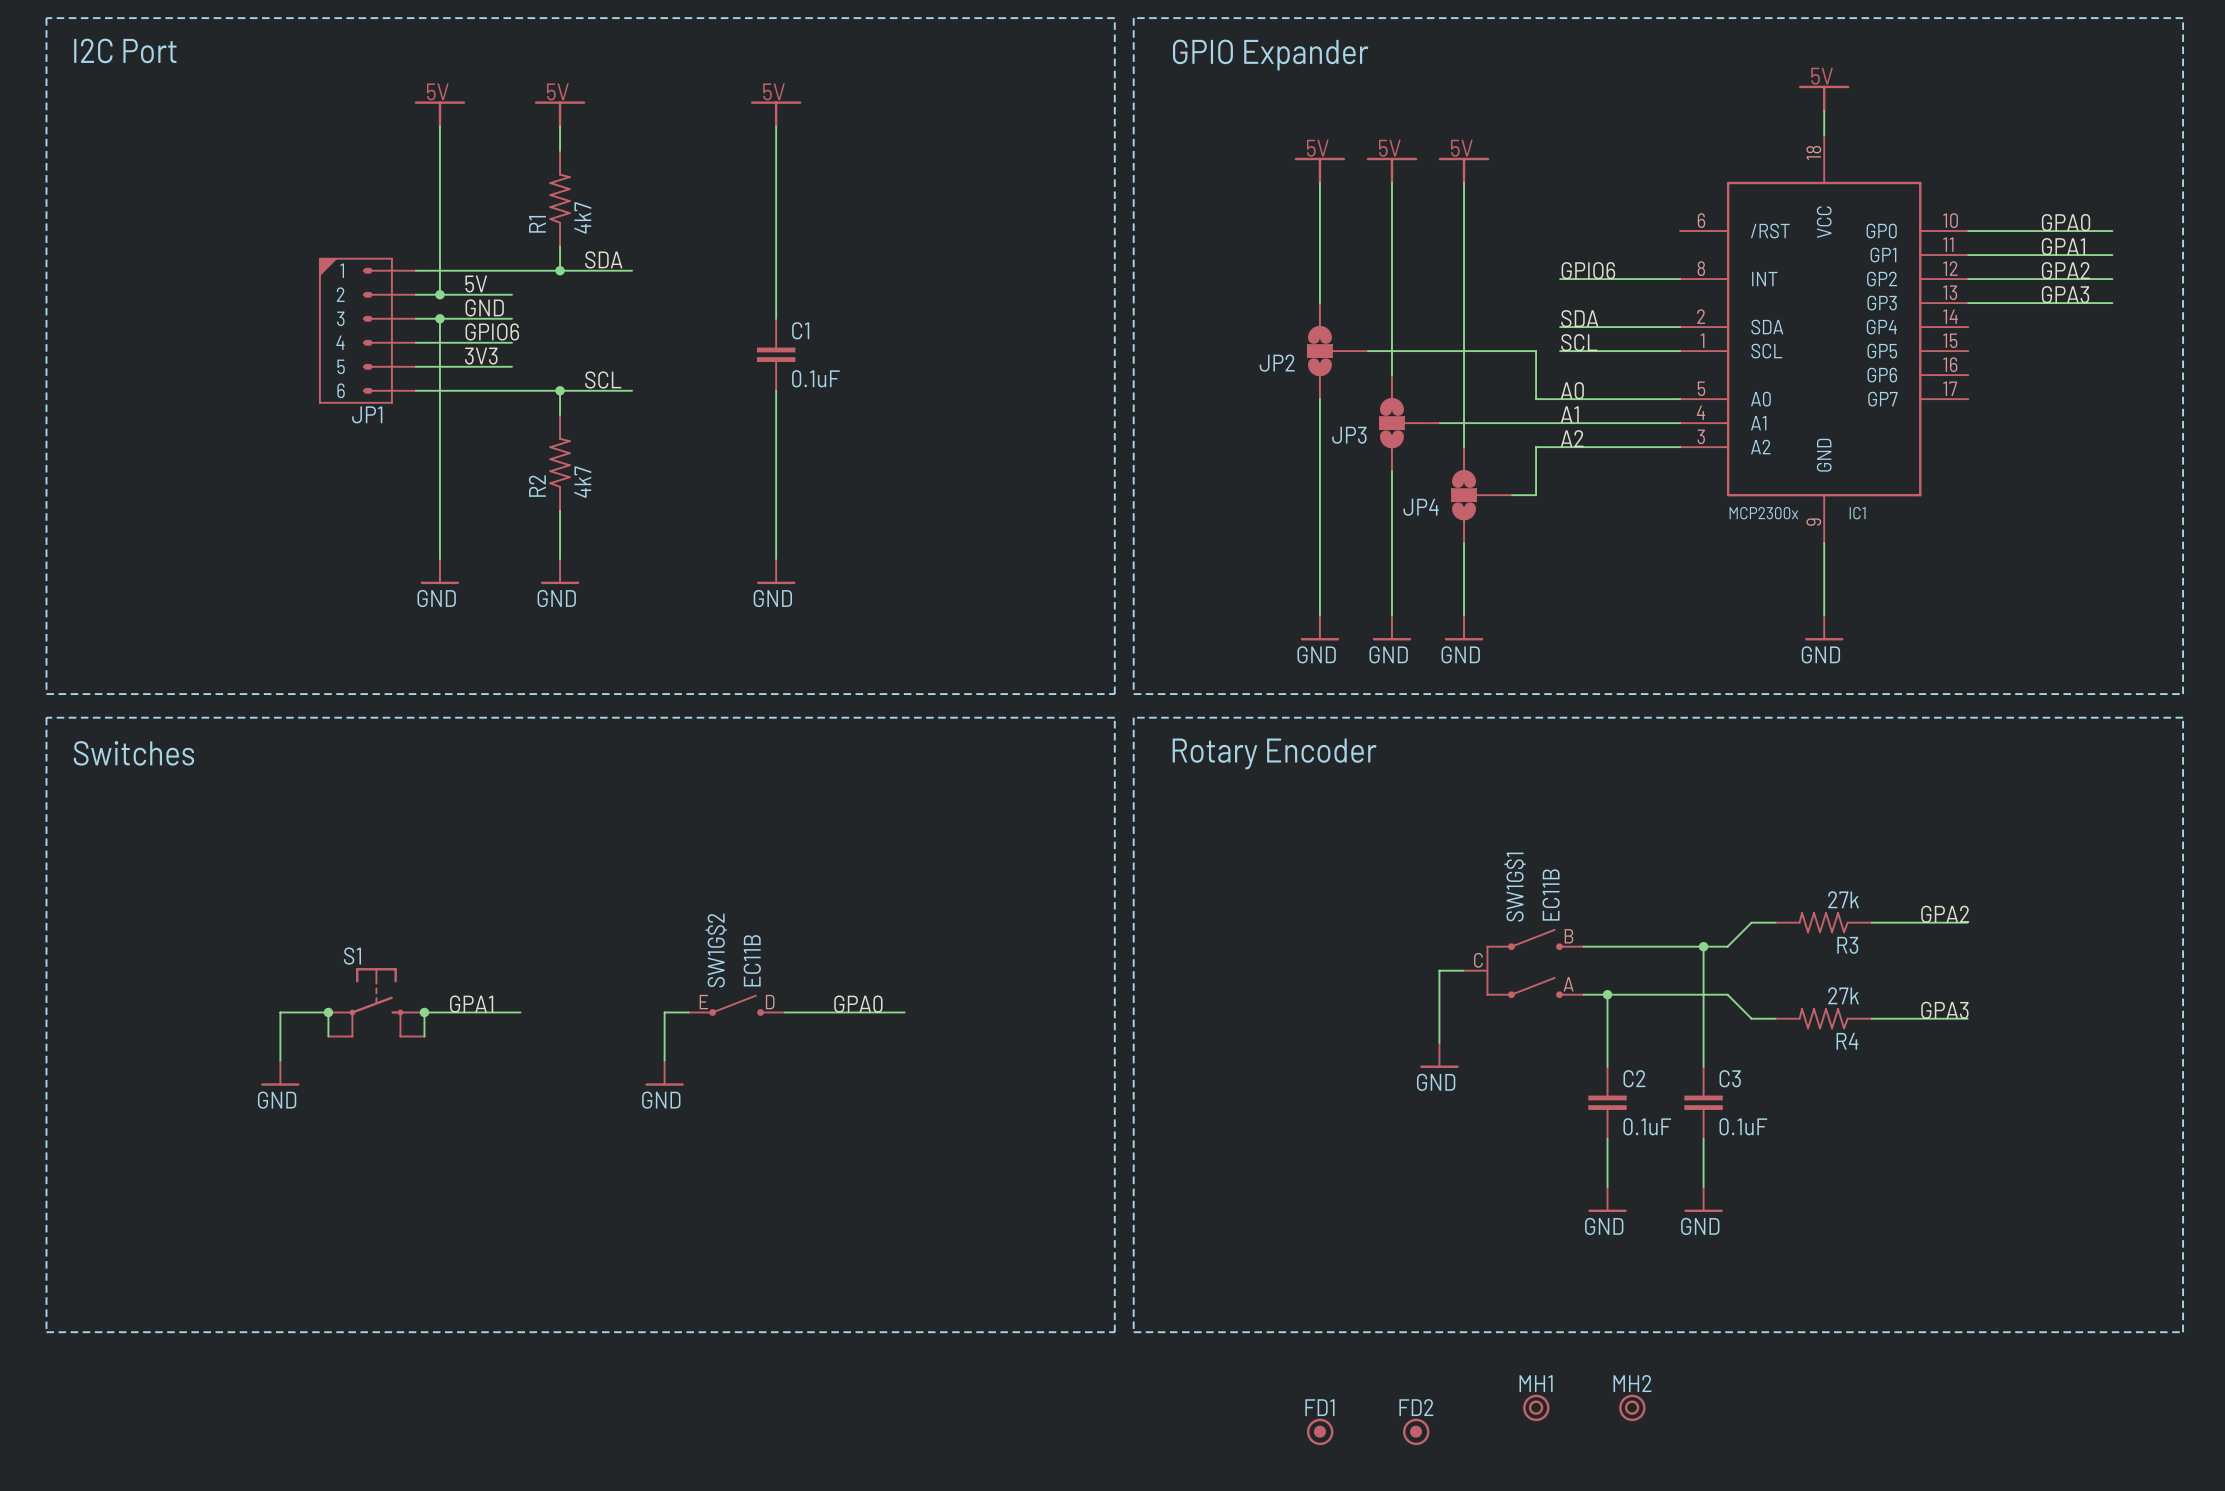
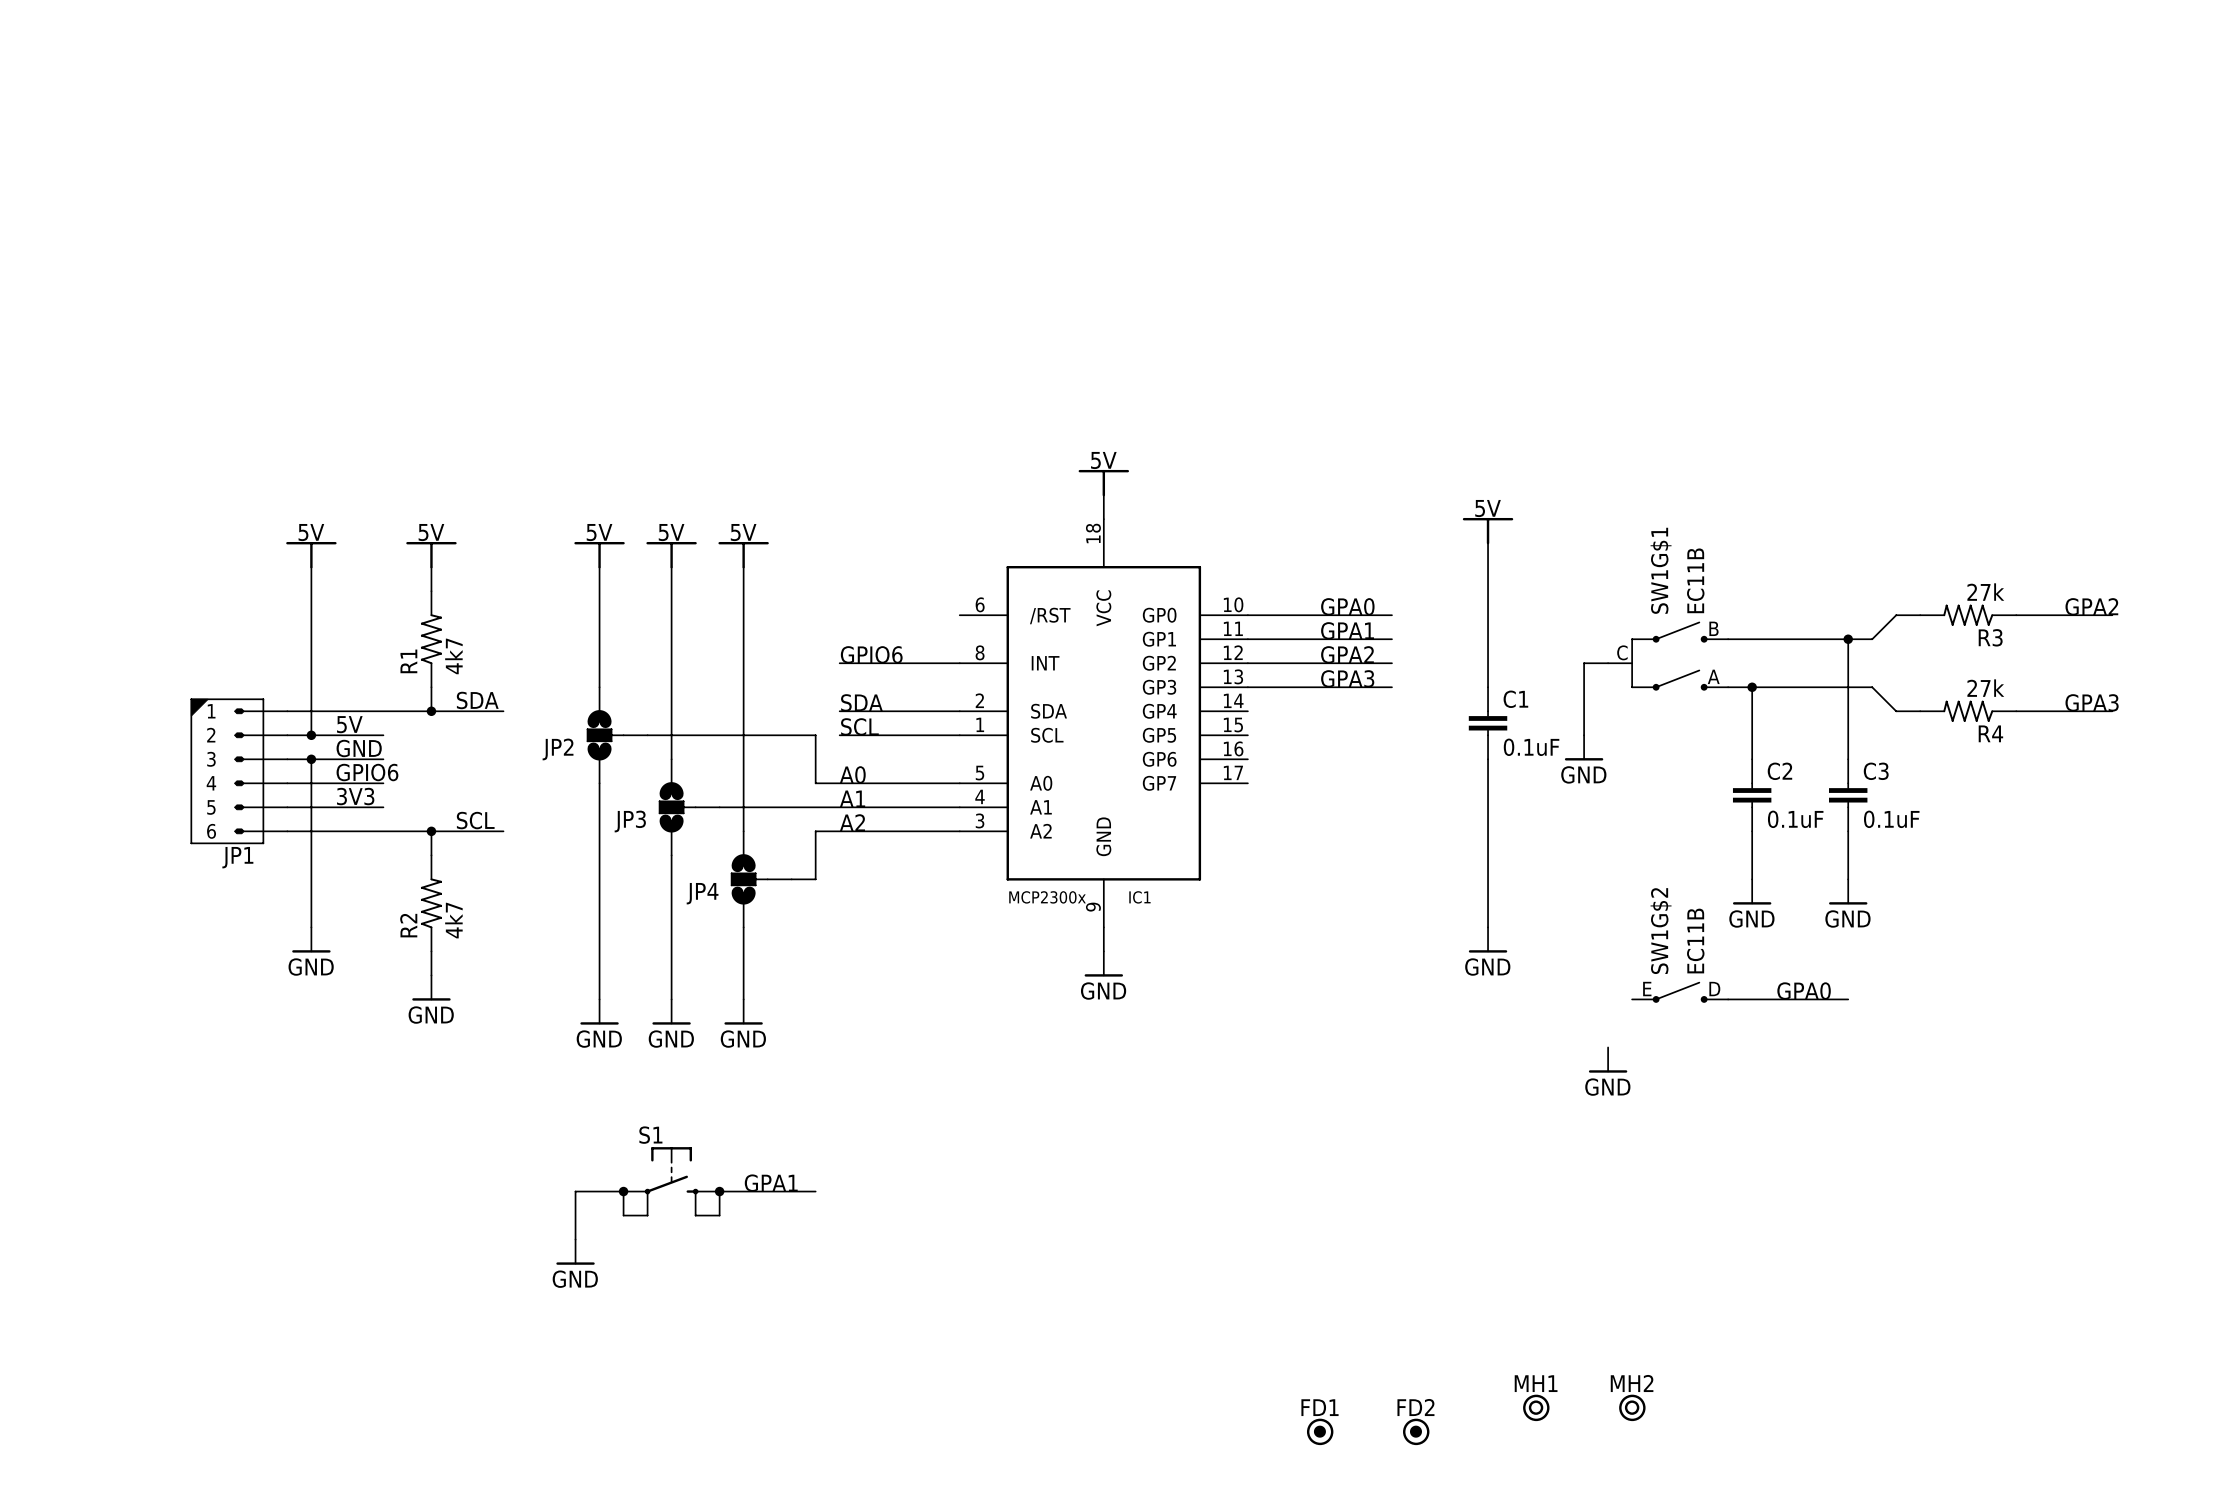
line: (46, 18) (1114, 18) (1114, 694) (46, 694) (46, 18) -> none
line: (1133, 18) (2183, 18) (2183, 694) (1133, 694) (1133, 18) -> none
text: I2C Port (125, 50) -> none
text: GPIO Expander (1270, 55) -> none
power symbol: (1824, 98) -> none
wire: (1824, 110) (1824, 134) -> none
power symbol: (439, 114) -> none
power symbol: (560, 114) -> none
power symbol: (776, 114) -> none
wire: (439, 126) (439, 294) -> none
wire: (560, 126) (560, 150) -> none
wire: (776, 126) (776, 318) -> none
power symbol: (1319, 170) -> none
power symbol: (1391, 170) -> none
power symbol: (1464, 170) -> none
wire: (1319, 182) (1319, 303) -> none
wire: (1391, 182) (1391, 375) -> none
wire: (1464, 182) (1464, 447) -> none
R1 position: (560, 198) -> (431, 639)
label: GPA0 (2066, 222) -> none
wire: (1968, 231) (2112, 231) -> none
wire: (560, 246) (560, 270) -> none
label: GPA1 (2063, 246) -> none
wire: (1968, 255) (2112, 255) -> none
label: SDA (603, 259) -> none
wire: (415, 270) (632, 270) -> none
junction: (560, 270) -> none
label: GPIO6 (1588, 270) -> none
label: GPA2 (2065, 270) -> none
wire: (1560, 279) (1680, 279) -> none
wire: (1968, 279) (2112, 279) -> none
label: 5V (476, 284) -> none
wire: (415, 294) (512, 294) -> none
junction: (439, 294) -> none
label: GPA3 (2065, 294) -> none
wire: (1968, 303) (2112, 303) -> none
label: GND (484, 307) -> none
wire: (415, 318) (512, 318) -> none
wire: (439, 318) (439, 558) -> none
junction: (439, 318) -> none
label: SDA (1579, 318) -> none
wire: (1560, 327) (1680, 327) -> none
JP1 position: (367, 330) -> (239, 771)
label: GPIO6 (492, 331) -> none
IC1 position: (1824, 339) -> (1103, 723)
wire: (415, 342) (512, 342) -> none
label: SCL (1579, 342) -> none
JP2 position: (1337, 351) -> (617, 735)
wire: (1367, 351) (1536, 351) (1536, 399) (1680, 399) -> none
wire: (1560, 351) (1680, 351) -> none
C1 position: (776, 354) -> (1488, 723)
label: 3V3 (481, 356) -> none
wire: (415, 366) (512, 366) -> none
label: SCL (603, 380) -> none
wire: (415, 390) (632, 390) -> none
wire: (560, 390) (560, 414) -> (431, 567) (431, 591)
junction: (560, 390) -> none
wire: (776, 390) (776, 558) -> none
label: A0 (1572, 390) -> none
wire: (1319, 399) (1319, 615) -> none
label: A1 (1569, 414) -> none
JP3 position: (1409, 423) -> (689, 807)
wire: (1440, 423) (1680, 423) -> none
label: A2 (1572, 438) -> none
wire: (1680, 447) (1536, 447) (1536, 495) (1512, 495) -> none
R2 position: (560, 462) -> (431, 903)
wire: (1391, 471) (1391, 615) -> (1247, 615) (1391, 615)
power symbol: none -> (1103, 483)
wire: none -> (1103, 495) (1103, 519)
JP4 position: (1481, 495) -> (761, 879)
wire: (560, 510) (560, 558) -> none
power symbol: none -> (1488, 531)
wire: (1464, 543) (1464, 615) -> none
wire: none -> (1488, 543) (1488, 687)
wire: (1824, 543) (1824, 615) -> (1752, 687) (1752, 759)
power symbol: none -> (311, 555)
power symbol: none -> (431, 555)
power symbol: none -> (599, 555)
power symbol: none -> (671, 555)
power symbol: none -> (743, 555)
wire: none -> (311, 567) (311, 735)
wire: none -> (599, 567) (599, 687)
wire: none -> (671, 567) (671, 759)
wire: none -> (743, 567) (743, 831)
power symbol: GND (439, 571) -> none
power symbol: GND (560, 571) -> none
power symbol: GND (776, 571) -> none
label: none -> GPA0 (1347, 606)
label: none -> GPA2 (2091, 606)
wire: none -> (1920, 615) (1896, 615) (1872, 639) (1728, 639)
wire: none -> (2016, 615) (2112, 615)
power symbol: GND (1319, 627) -> none
power symbol: GND (1391, 627) -> none
power symbol: GND (1464, 627) -> none
power symbol: GND (1824, 627) -> none
label: none -> GPA1 (1347, 630)
wire: none -> (1247, 639) (1391, 639)
wire: none -> (1848, 639) (1848, 759)
junction: none -> (1848, 639)
label: none -> GPIO6 (871, 654)
label: none -> GPA2 (1347, 654)
wire: none -> (839, 663) (959, 663)
wire: none -> (1247, 663) (1391, 663)
wire: none -> (1608, 663) (1584, 663) (1584, 735)
label: none -> GPA3 (1347, 678)
wire: none -> (431, 687) (431, 711)
wire: none -> (1247, 687) (1391, 687)
wire: none -> (1728, 687) (1872, 687) (1896, 711) (1920, 711)
junction: none -> (1752, 687)
label: none -> SDA (477, 700)
label: none -> SDA (861, 702)
label: none -> GPA3 (2092, 702)
wire: none -> (287, 711) (503, 711)
junction: none -> (431, 711)
wire: none -> (839, 711) (959, 711)
wire: none -> (2016, 711) (2112, 711)
line: (46, 717) (46, 1332) (1114, 1332) (1114, 717) (46, 717) -> none
line: (1133, 717) (1133, 1332) (2183, 1332) (2183, 717) (1133, 717) -> none
label: none -> 5V (349, 724)
label: none -> SCL (859, 726)
wire: none -> (287, 735) (383, 735)
junction: none -> (311, 735)
wire: none -> (647, 735) (815, 735) (815, 783) (959, 783)
wire: none -> (839, 735) (959, 735)
power symbol: none -> GND (1584, 747)
label: none -> GND (359, 748)
text: Switches (133, 753) -> none
text: Rotary Encoder (1274, 753) -> none
wire: none -> (287, 759) (383, 759)
wire: none -> (311, 759) (311, 927)
junction: none -> (311, 759)
wire: none -> (1488, 759) (1488, 927)
label: none -> GPIO6 (367, 772)
label: none -> A0 (852, 774)
wire: none -> (287, 783) (383, 783)
wire: none -> (599, 783) (599, 999)
label: none -> 3V3 (355, 796)
label: none -> A1 (852, 798)
wire: none -> (287, 807) (383, 807)
wire: none -> (719, 807) (959, 807)
label: none -> SCL (475, 820)
label: none -> A2 (852, 822)
wire: none -> (287, 831) (503, 831)
wire: none -> (431, 831) (431, 855)
junction: none -> (431, 831)
wire: none -> (959, 831) (815, 831) (815, 879) (791, 879)
wire: none -> (1752, 831) (1752, 879)
wire: none -> (1848, 831) (1848, 879)
wire: none -> (671, 855) (671, 999)
power symbol: none -> GND (1752, 891)
power symbol: none -> GND (1848, 891)
label: GPA2 (1945, 914) -> none
wire: (1775, 922) (1751, 922) (1727, 946) (1583, 946) -> none
R3 position: (1823, 922) -> (1968, 615)
wire: (1871, 922) (1967, 922) -> none
wire: none -> (743, 927) (743, 999)
wire: none -> (1103, 927) (1103, 951)
power symbol: none -> GND (311, 940)
power symbol: none -> GND (1488, 940)
wire: (1703, 946) (1703, 1066) -> none
junction: (1703, 946) -> none
wire: none -> (431, 951) (431, 975)
SW1G$1 position: (1523, 963) -> (1668, 656)
power symbol: none -> GND (1103, 964)
wire: (1463, 970) (1439, 970) (1439, 1042) -> none
power symbol: none -> GND (431, 988)
label: none -> GPA0 (1804, 991)
wire: (1583, 994) (1727, 994) (1751, 1018) (1775, 1018) -> none
wire: (1607, 994) (1607, 1066) -> none
junction: (1607, 994) -> none
wire: none -> (1728, 999) (1848, 999)
S1 position: (376, 1002) -> (671, 1181)
label: GPA1 (471, 1004) -> none
label: GPA0 (858, 1004) -> none
SW1G$2 position: (736, 1005) -> (1680, 992)
label: GPA3 (1944, 1010) -> none
junction: (328, 1012) -> none
junction: (424, 1012) -> none
wire: (520, 1012) (424, 1012) (424, 1036) -> none
power symbol: none -> GND (599, 1012)
power symbol: none -> GND (671, 1012)
wire: (688, 1012) (664, 1012) (664, 1060) -> none
power symbol: none -> GND (743, 1012)
wire: (784, 1012) (904, 1012) -> none
R4 position: (1823, 1018) -> (1968, 711)
wire: (1871, 1018) (1967, 1018) -> none
wire: (328, 1036) (328, 1012) (280, 1012) (280, 1060) -> none
power symbol: GND (1439, 1055) -> none
power symbol: none -> GND (1608, 1060)
power symbol: GND (280, 1073) -> none
power symbol: GND (664, 1073) -> none
C2 position: (1607, 1102) -> (1752, 795)
C3 position: (1703, 1102) -> (1848, 795)
wire: (1607, 1138) (1607, 1186) -> none
wire: (1703, 1138) (1703, 1186) -> none
label: none -> GPA1 (771, 1183)
junction: none -> (623, 1191)
junction: none -> (719, 1191)
wire: none -> (815, 1191) (719, 1191) (719, 1215)
power symbol: GND (1607, 1199) -> none
power symbol: GND (1703, 1199) -> none
wire: none -> (623, 1215) (623, 1191) (575, 1191) (575, 1239)
power symbol: none -> GND (575, 1252)

